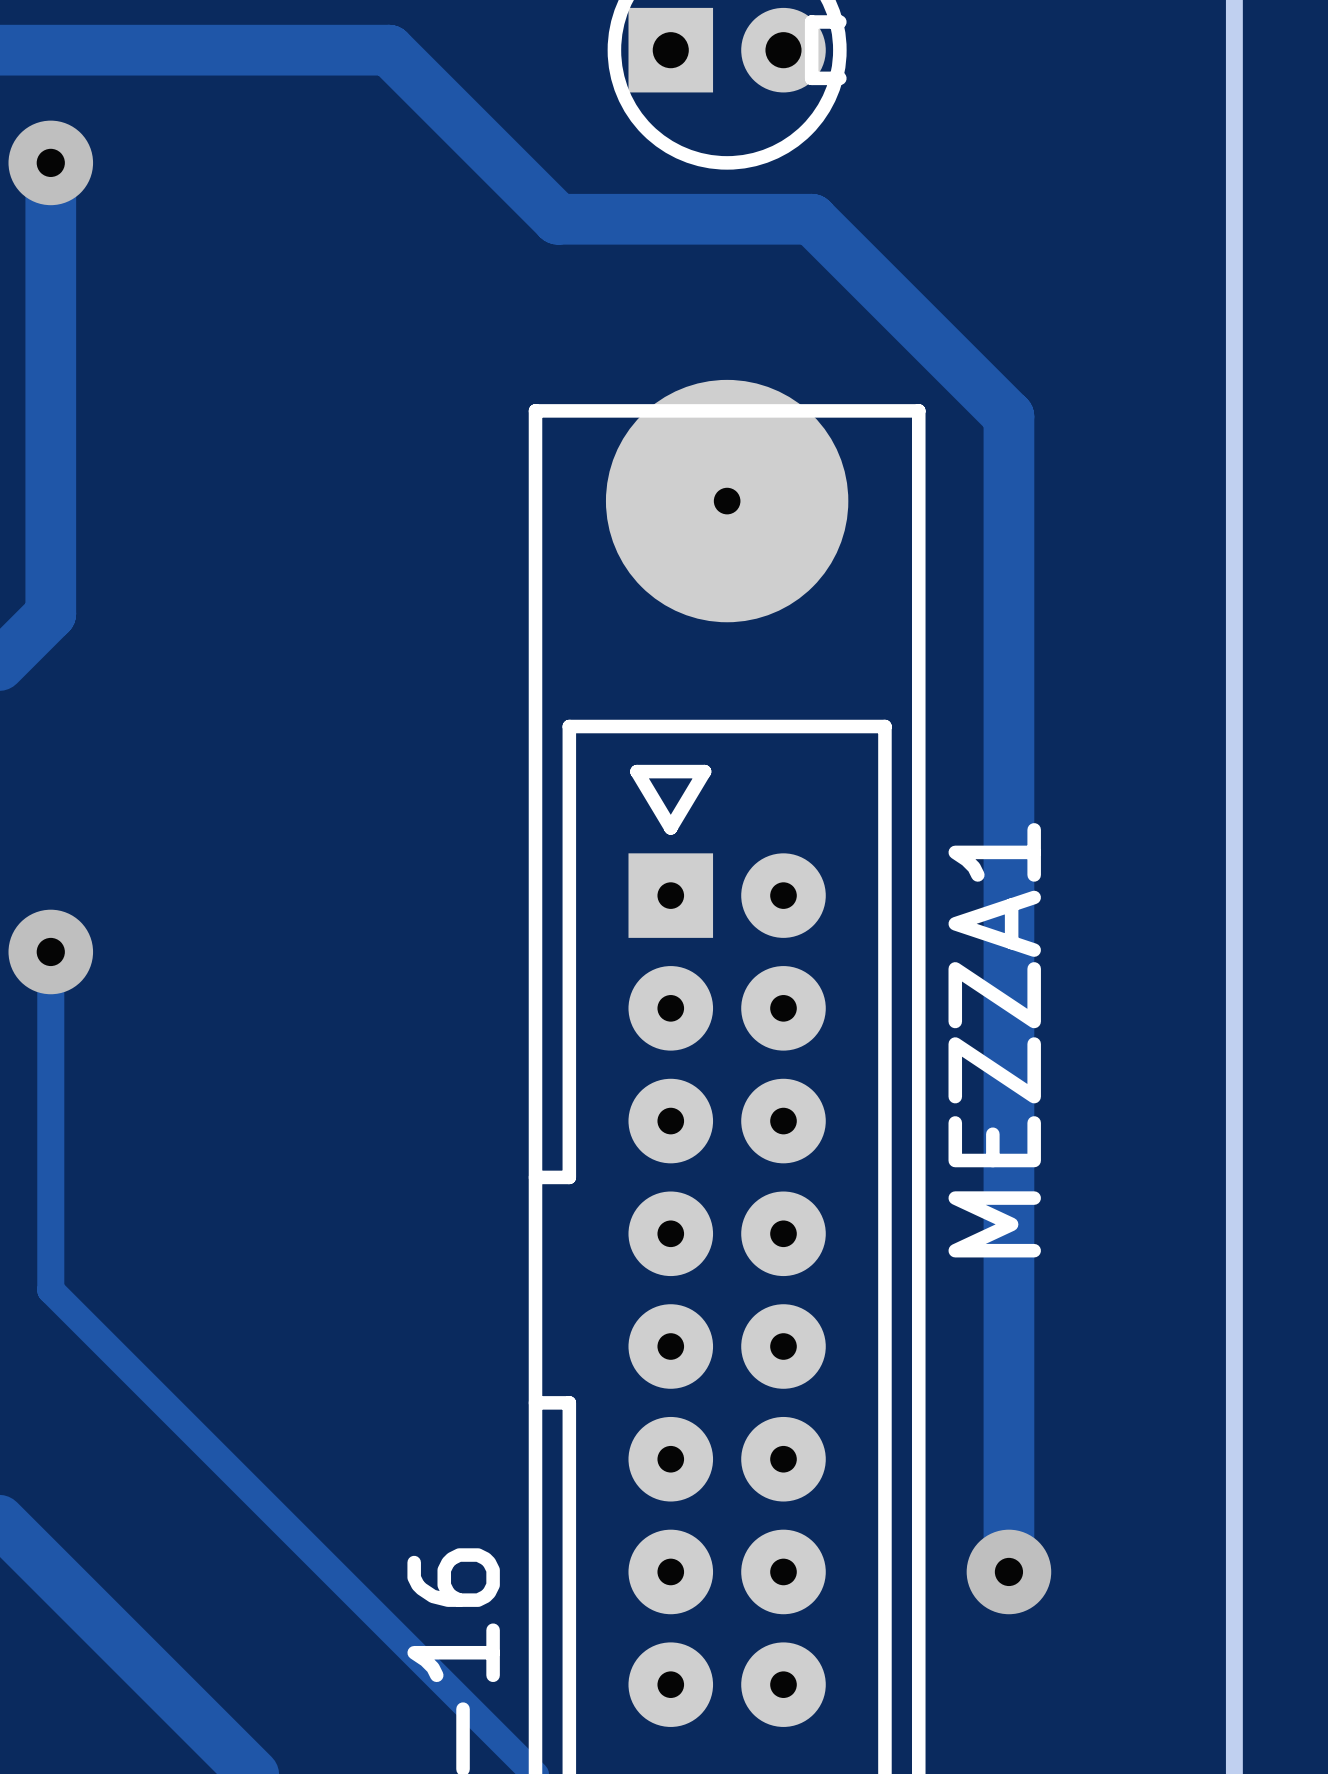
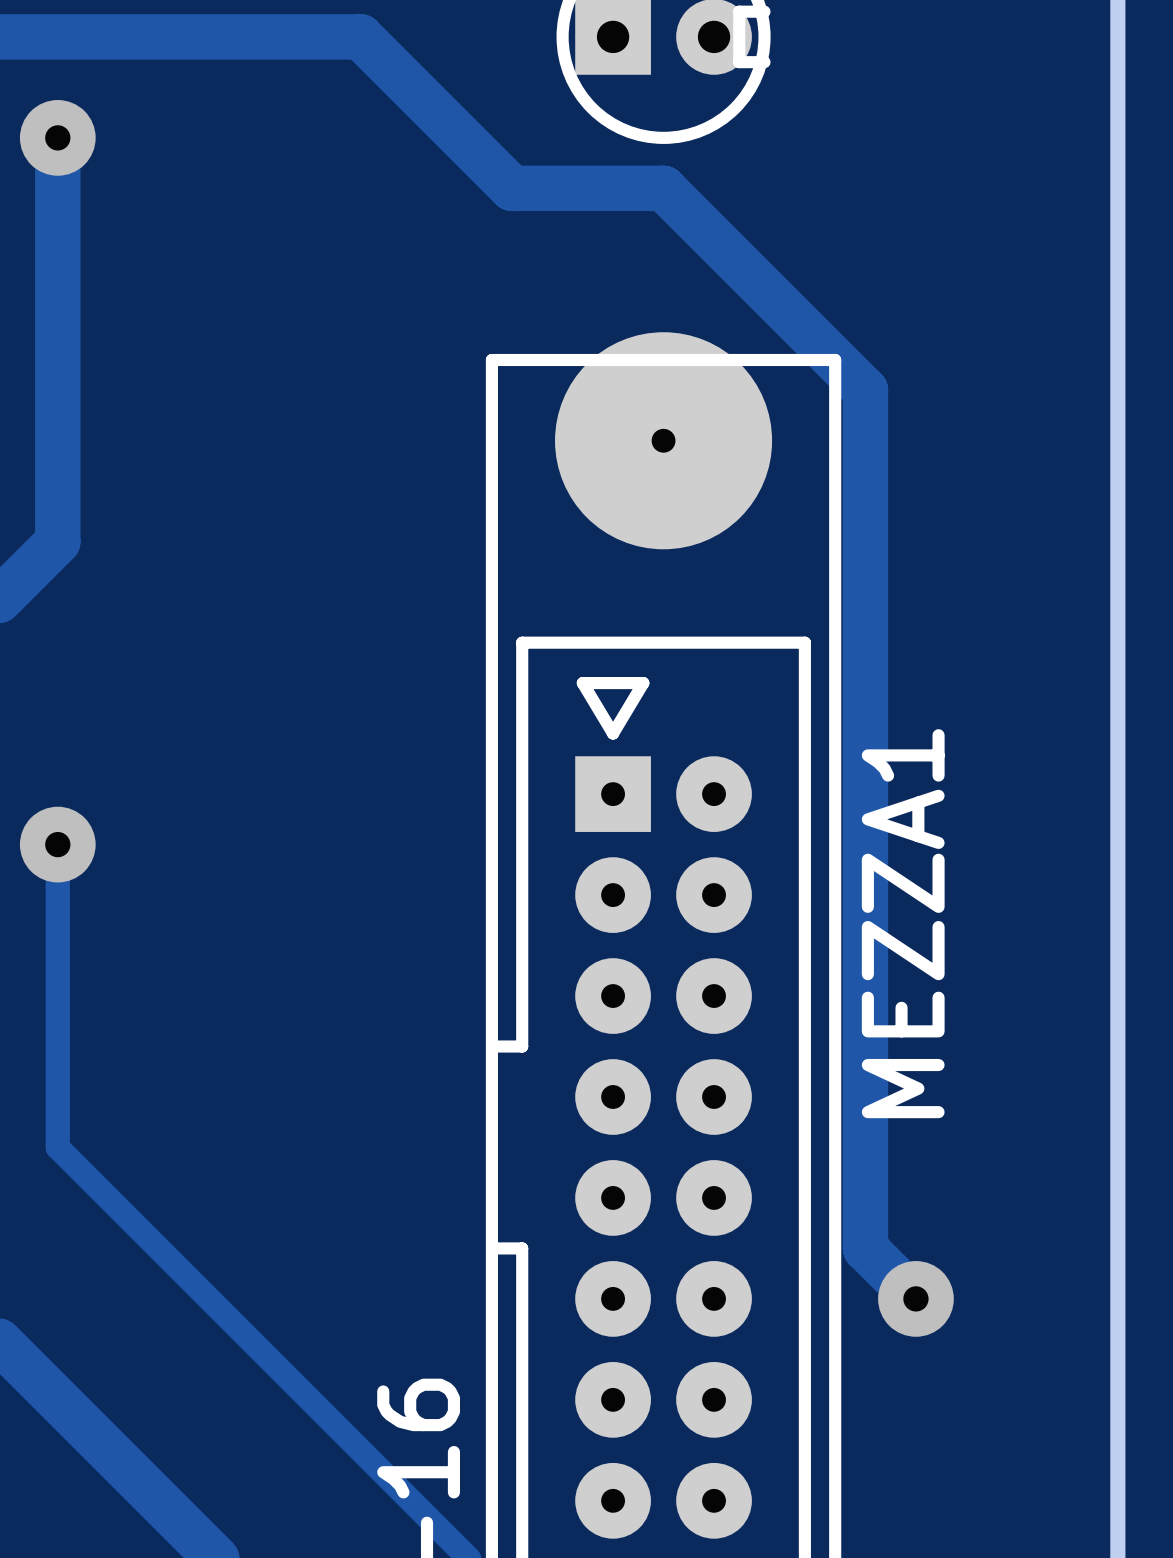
track: (727, 219) (811, 219) (1008, 416) (1008, 1571) -> (663, 188) (865, 390) (865, 1248) (915, 1298)
via position: (1008, 1571) -> (915, 1298)

